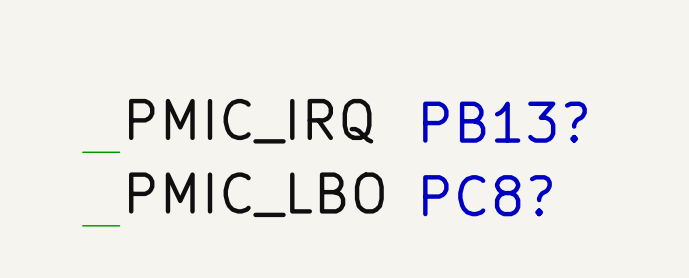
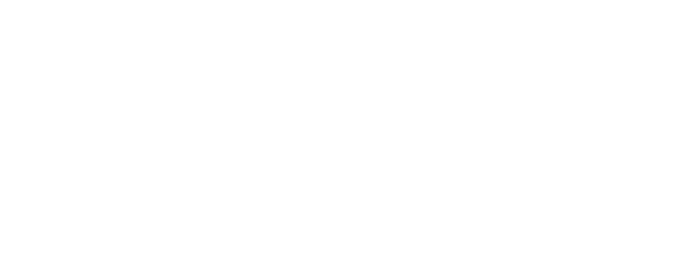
label: PMIC_IRQ (251, 121) -> none
text: PB13? (505, 122) -> none
wire: (82, 152) (119, 152) -> none
label: PMIC_LBO (256, 194) -> none
text: PC8? (487, 195) -> none
wire: (82, 225) (119, 225) -> none

